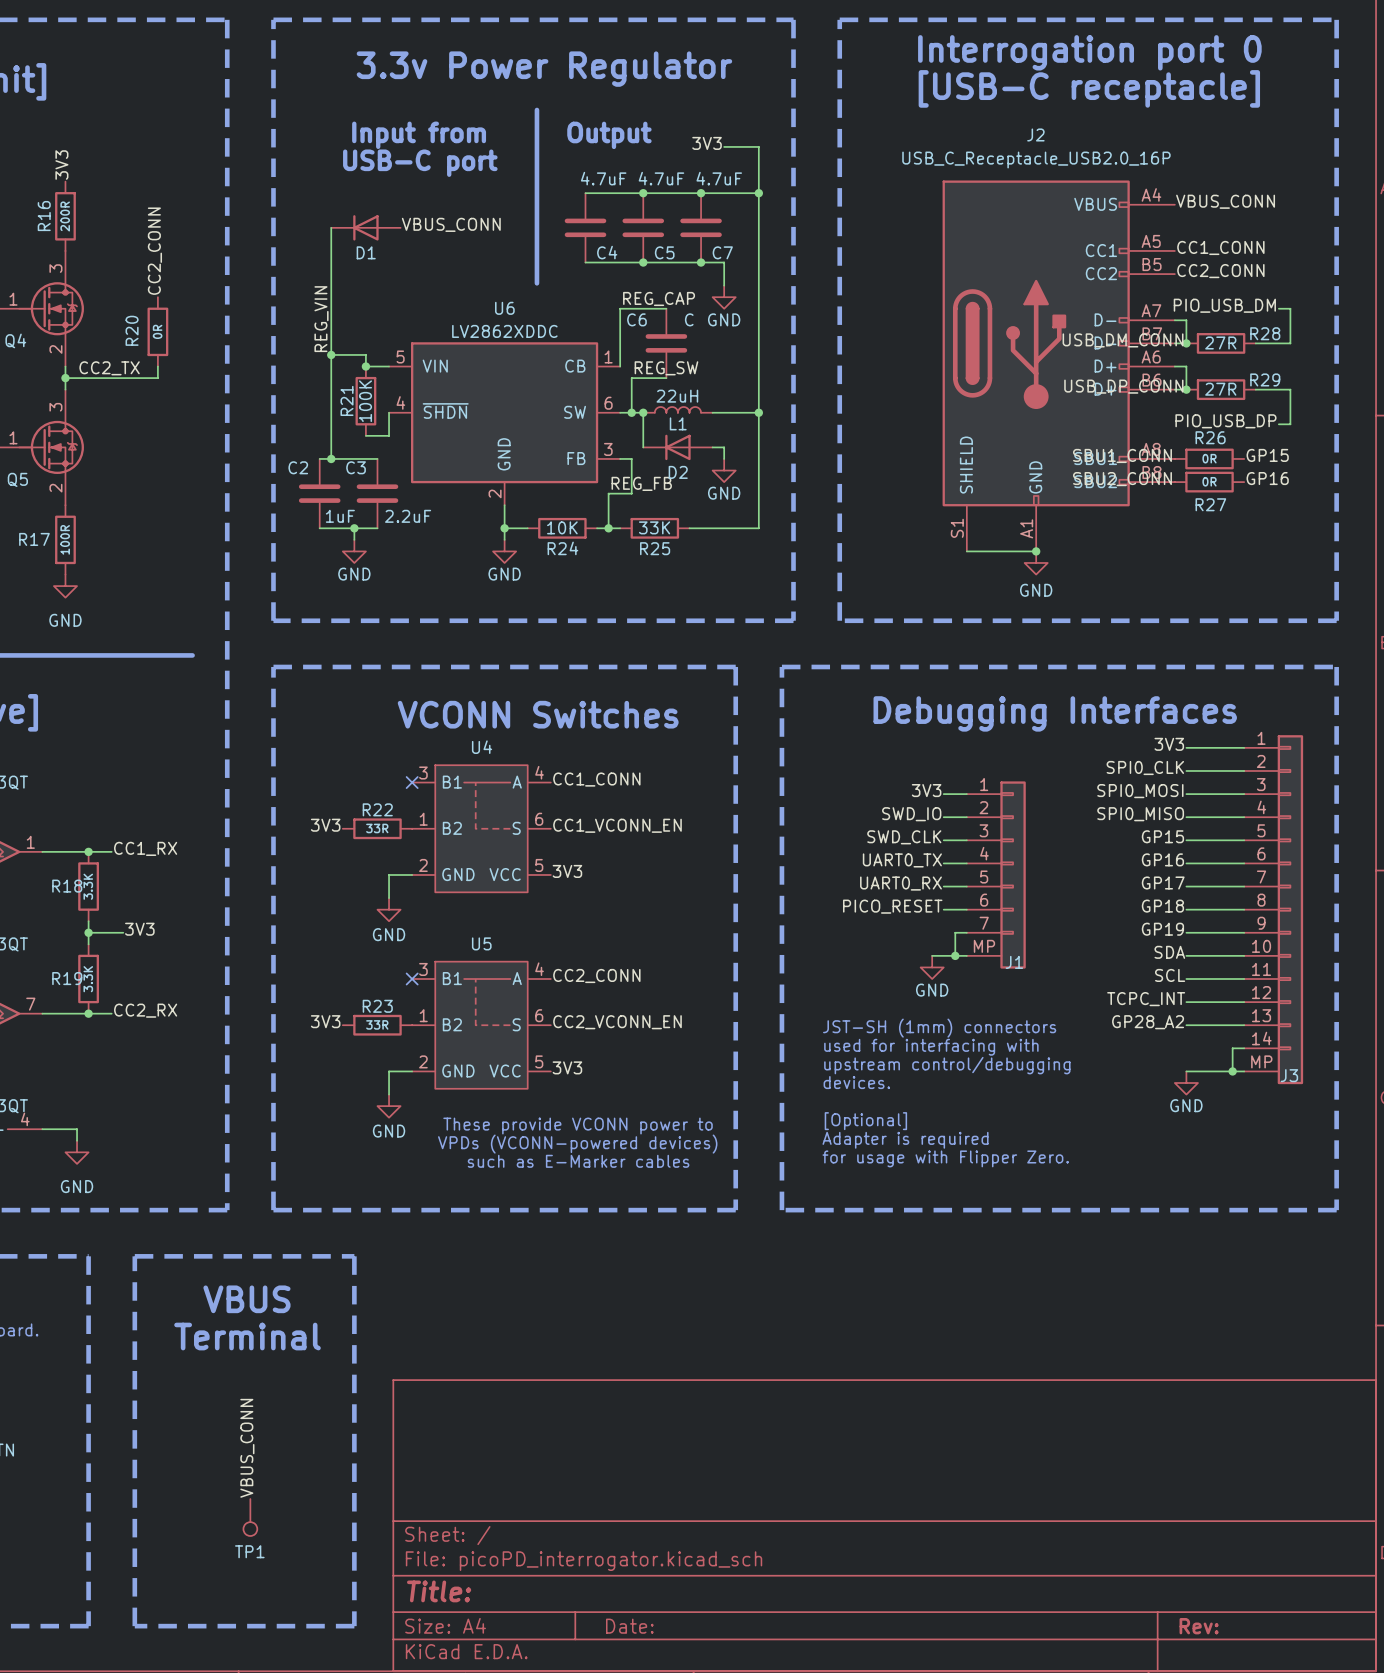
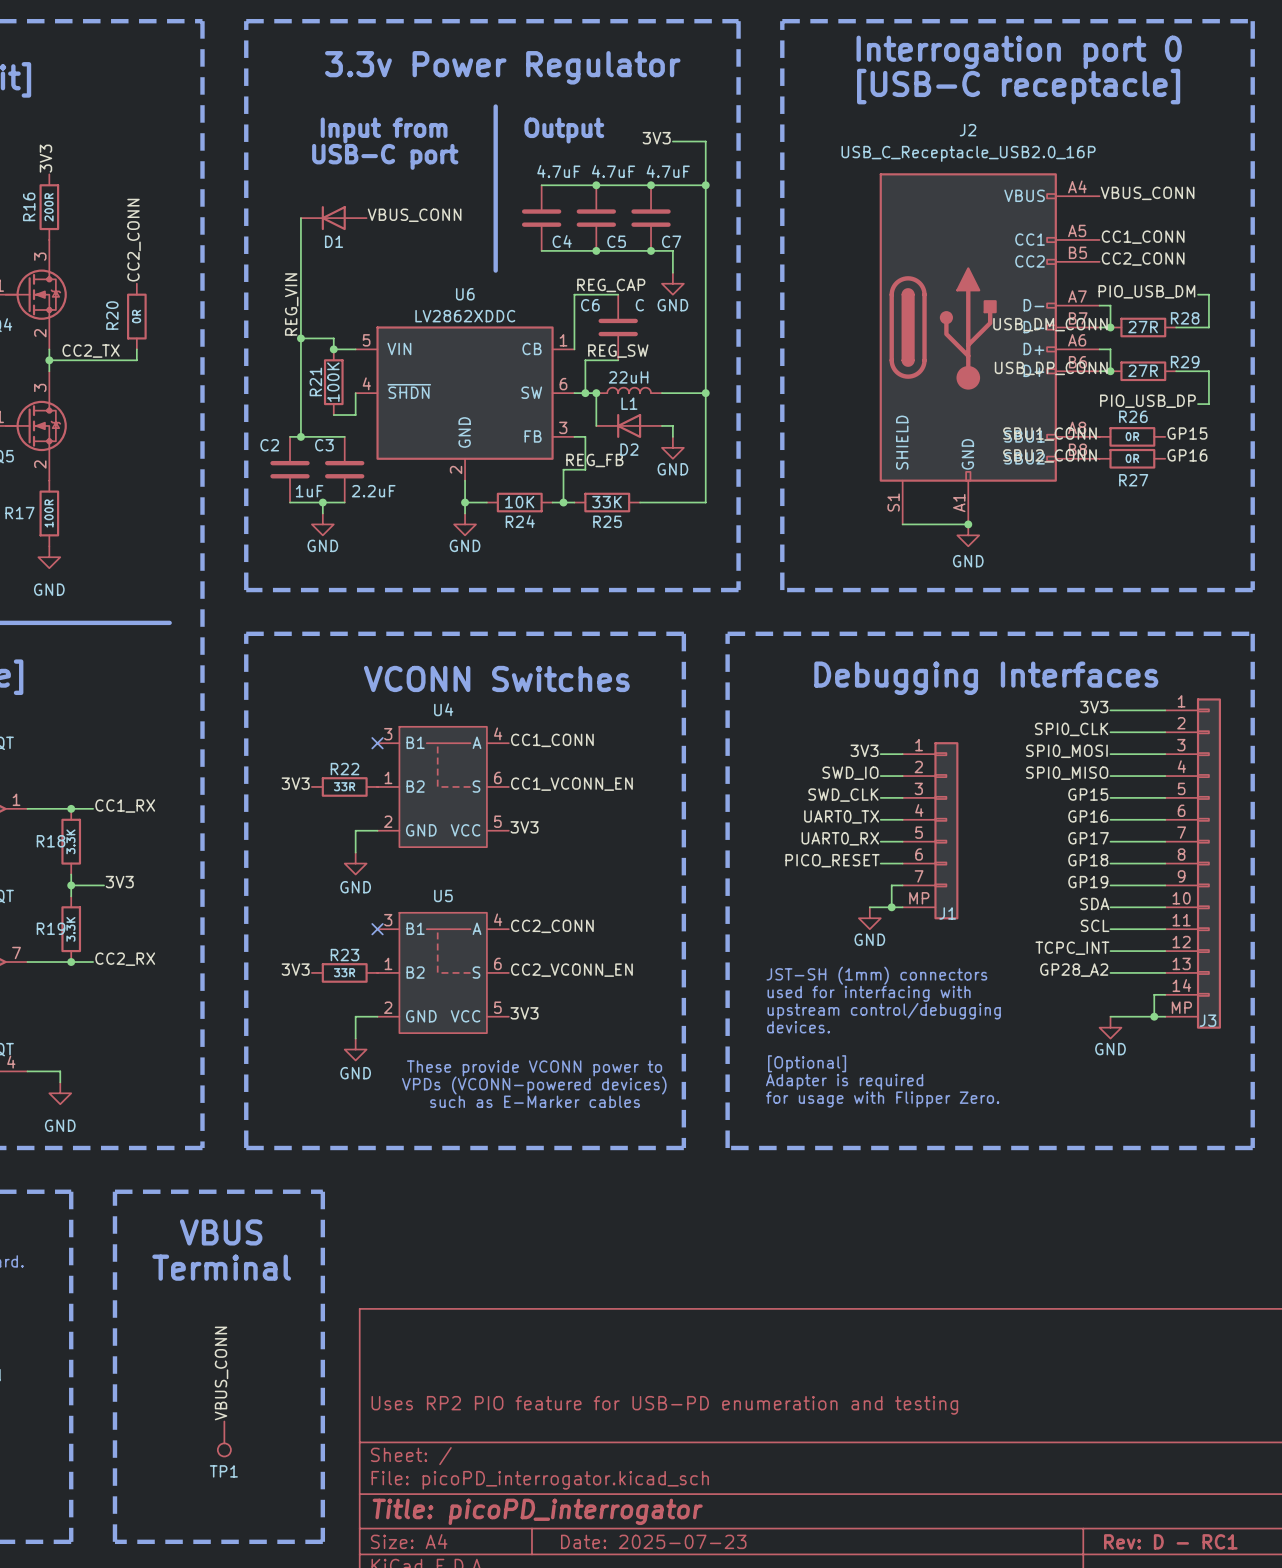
title block: none -> Uses RP2 PIO feature for USB-PD enumeration and testing (664, 1405)
title block: Title: (439, 1591) -> Title: picoPD_interrogator (537, 1511)
title block: Date: (629, 1626) -> Date: 2025-07-23 (653, 1541)
title block: Rev: (1199, 1626) -> Rev: D - RC1 (1170, 1541)

